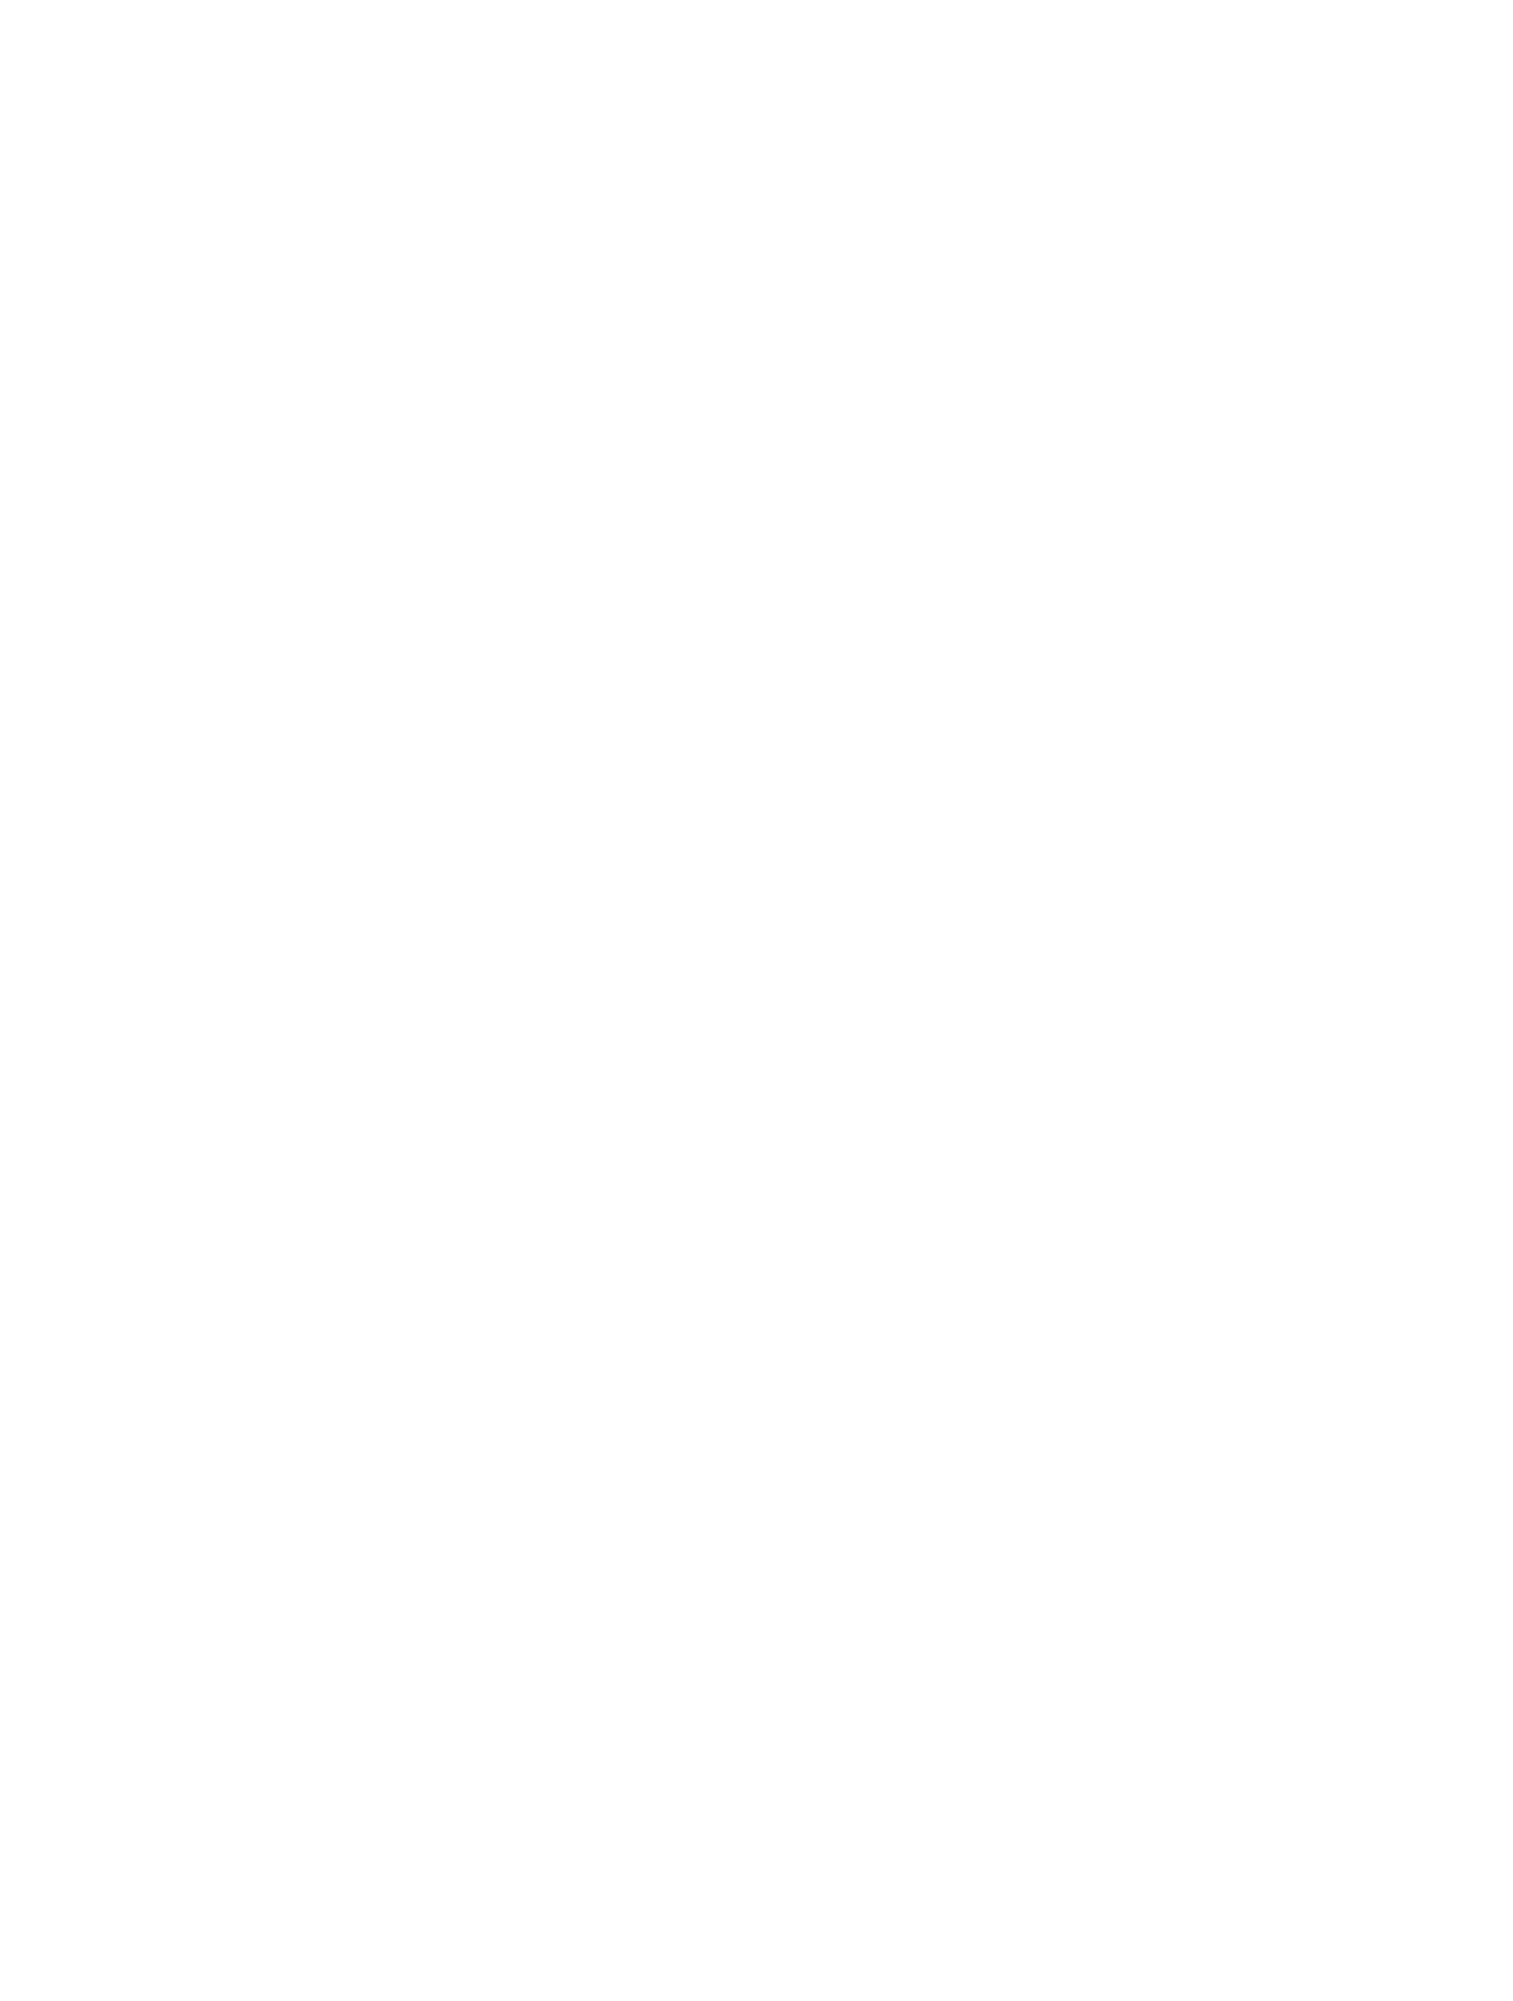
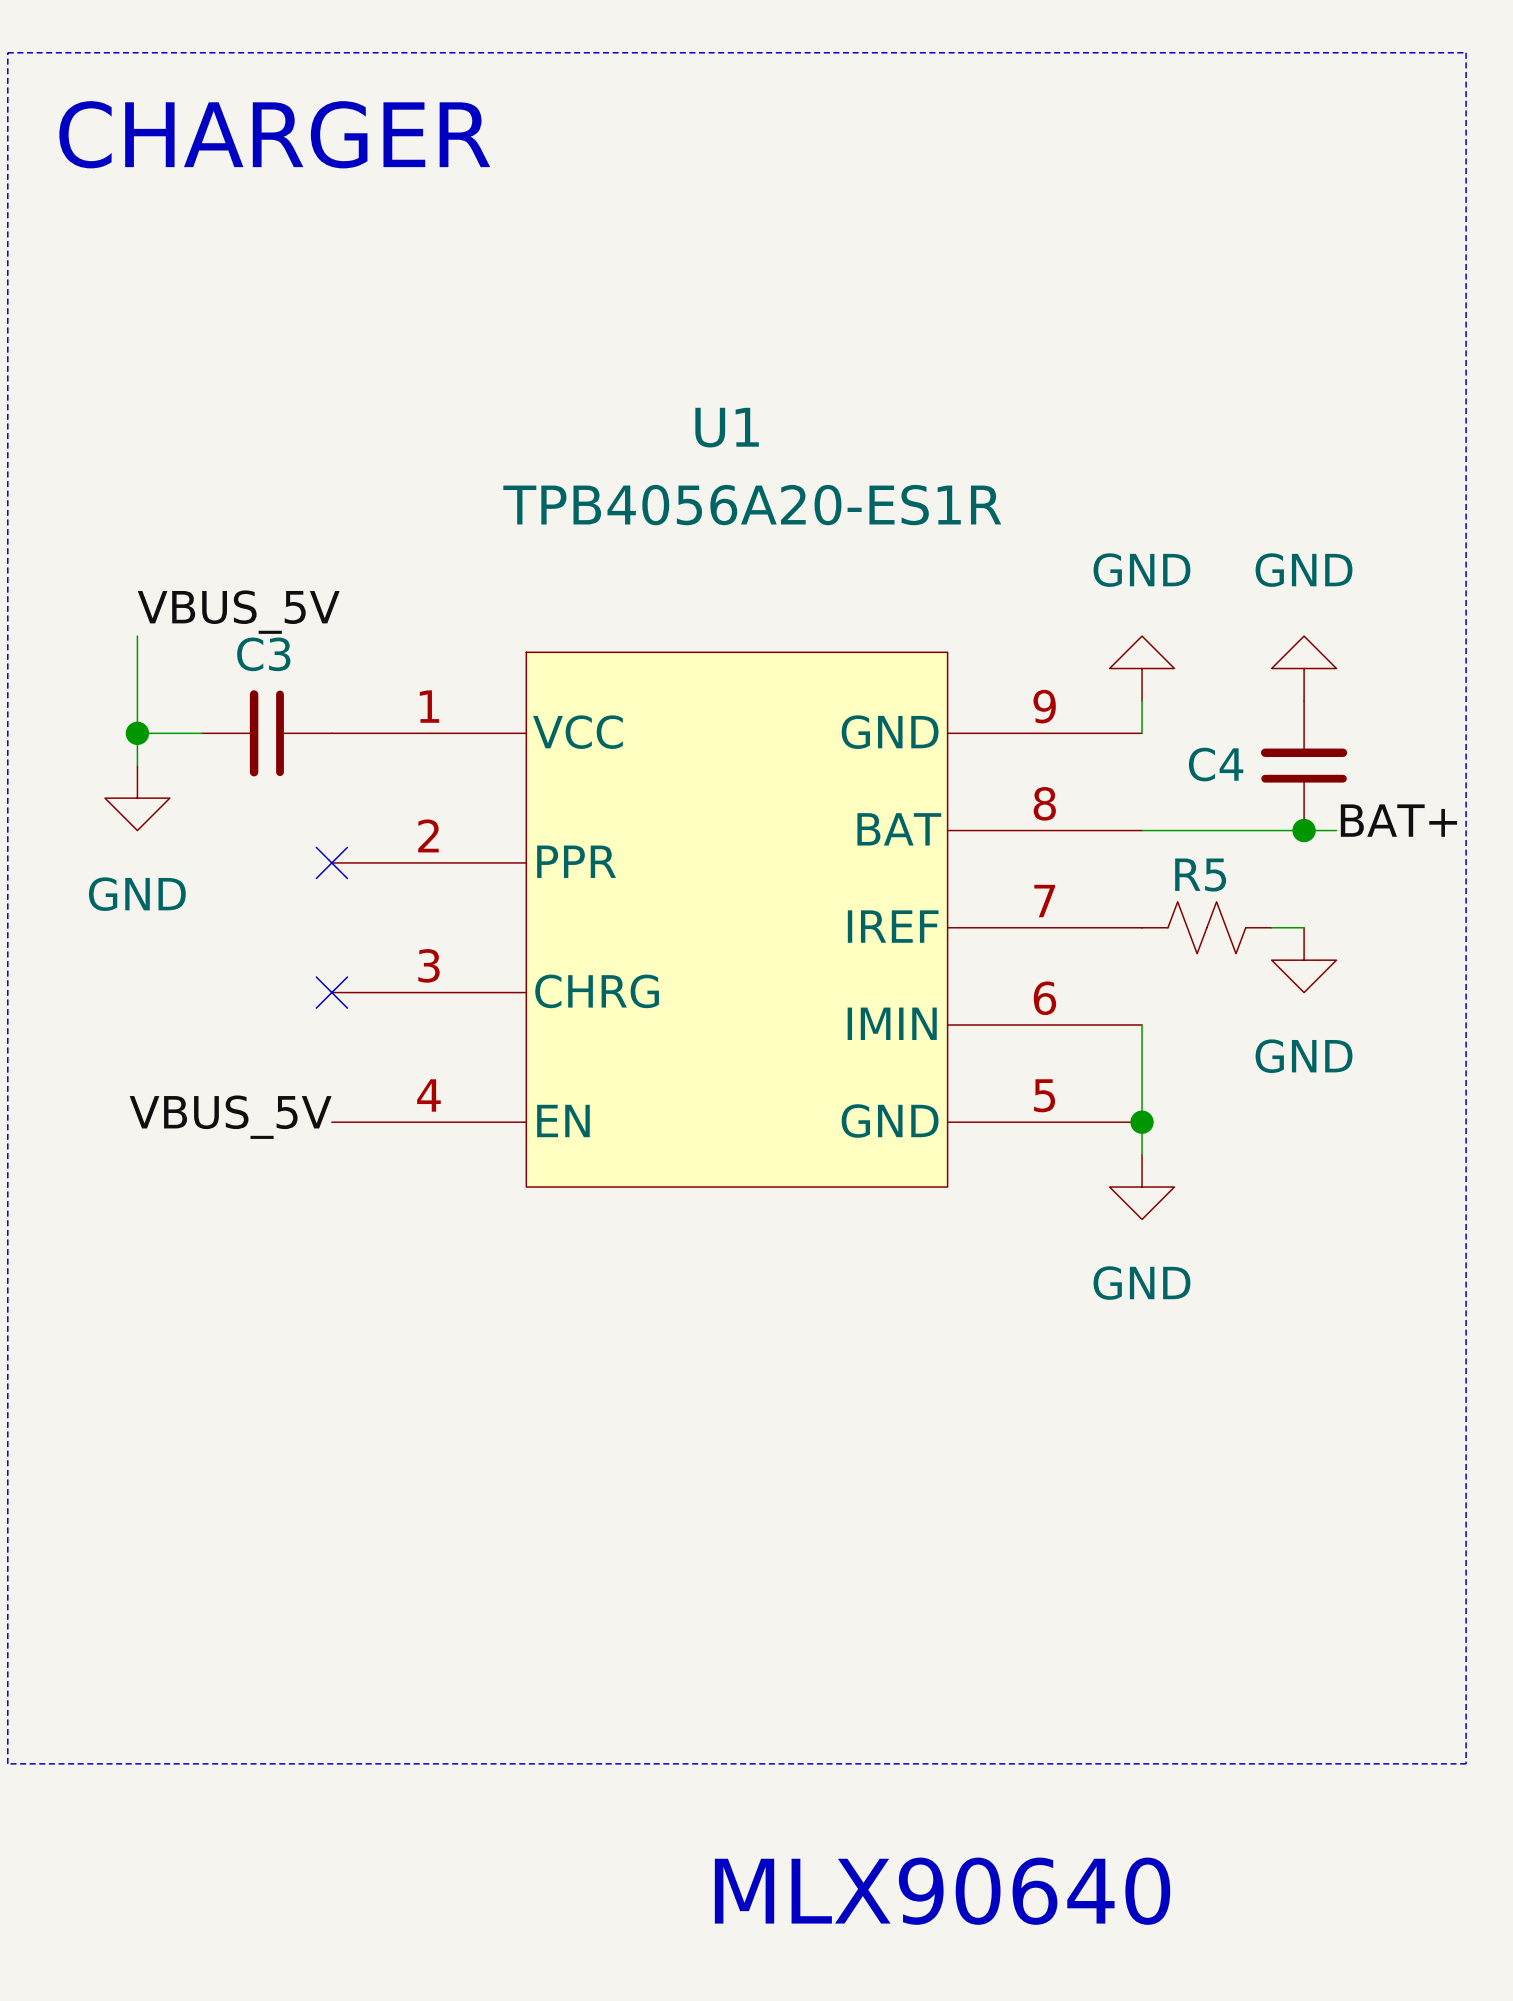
line: none -> (7, 52) (1466, 52) (1466, 1763) (7, 1763) (7, 52)
text: none -> CHARGER (274, 134)
label: none -> VBUS_5V (238, 612)
wire: none -> (137, 636) (137, 765)
power symbol: none -> GND (1142, 668)
power symbol: none -> GND (1304, 668)
wire: none -> (1142, 700) (1142, 733)
wire: none -> (137, 733) (202, 733)
junction: none -> (137, 733)
C3: none -> (267, 733)
C4: none -> (1304, 765)
power symbol: none -> GND (137, 798)
label: none -> BAT+ (1398, 820)
wire: none -> (1142, 830) (1336, 830)
junction: none -> (1304, 830)
no-connect mark: none -> (331, 862)
U1: none -> TPB4056A20-ES1R (736, 919)
R5: none -> (1206, 927)
wire: none -> (1271, 927) (1304, 927)
power symbol: none -> GND (1304, 960)
no-connect mark: none -> (331, 992)
wire: none -> (1142, 1024) (1142, 1154)
label: none -> VBUS_5V (230, 1117)
junction: none -> (1142, 1122)
power symbol: none -> GND (1142, 1187)
text: none -> MLX90640 (942, 1891)

